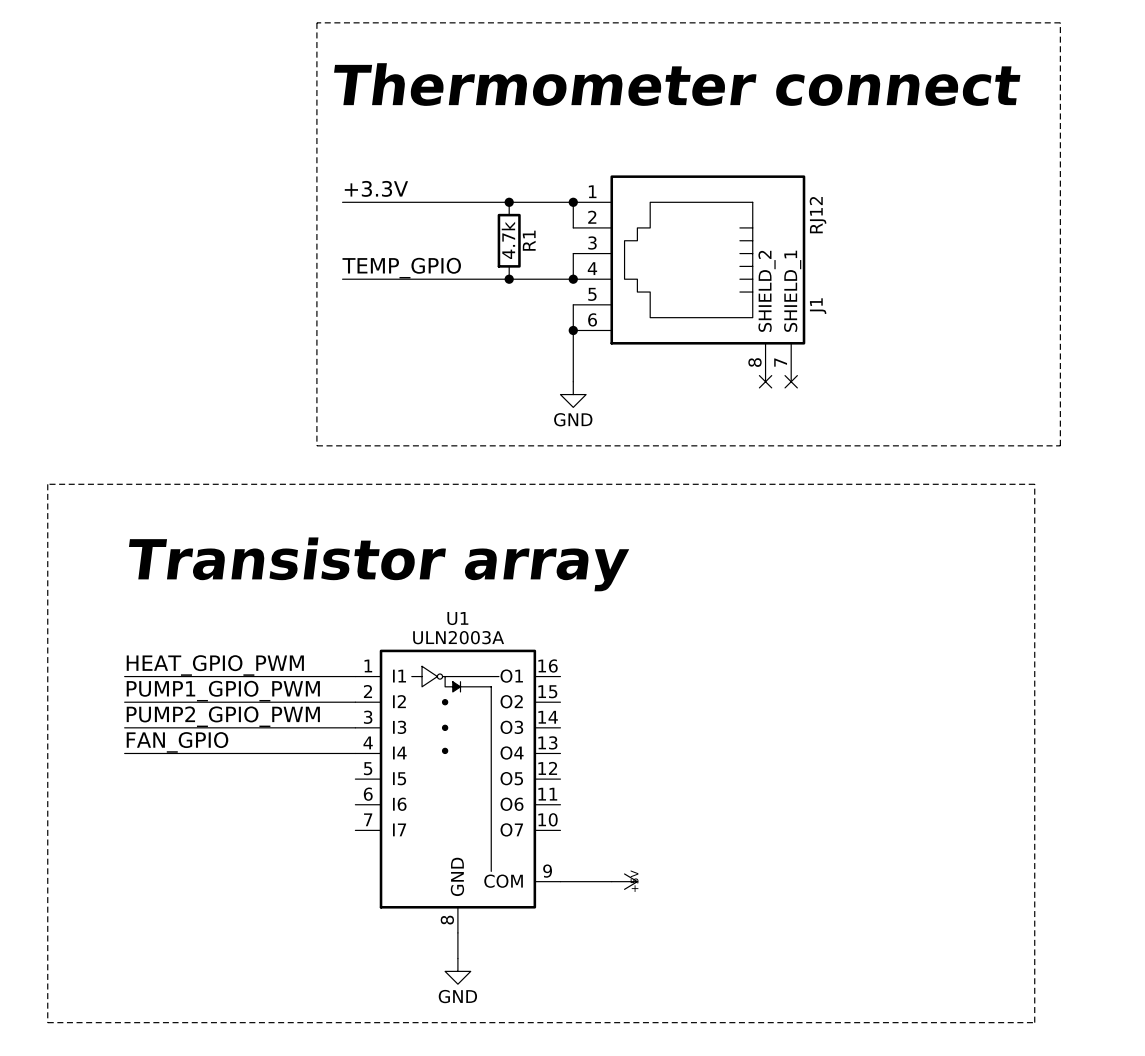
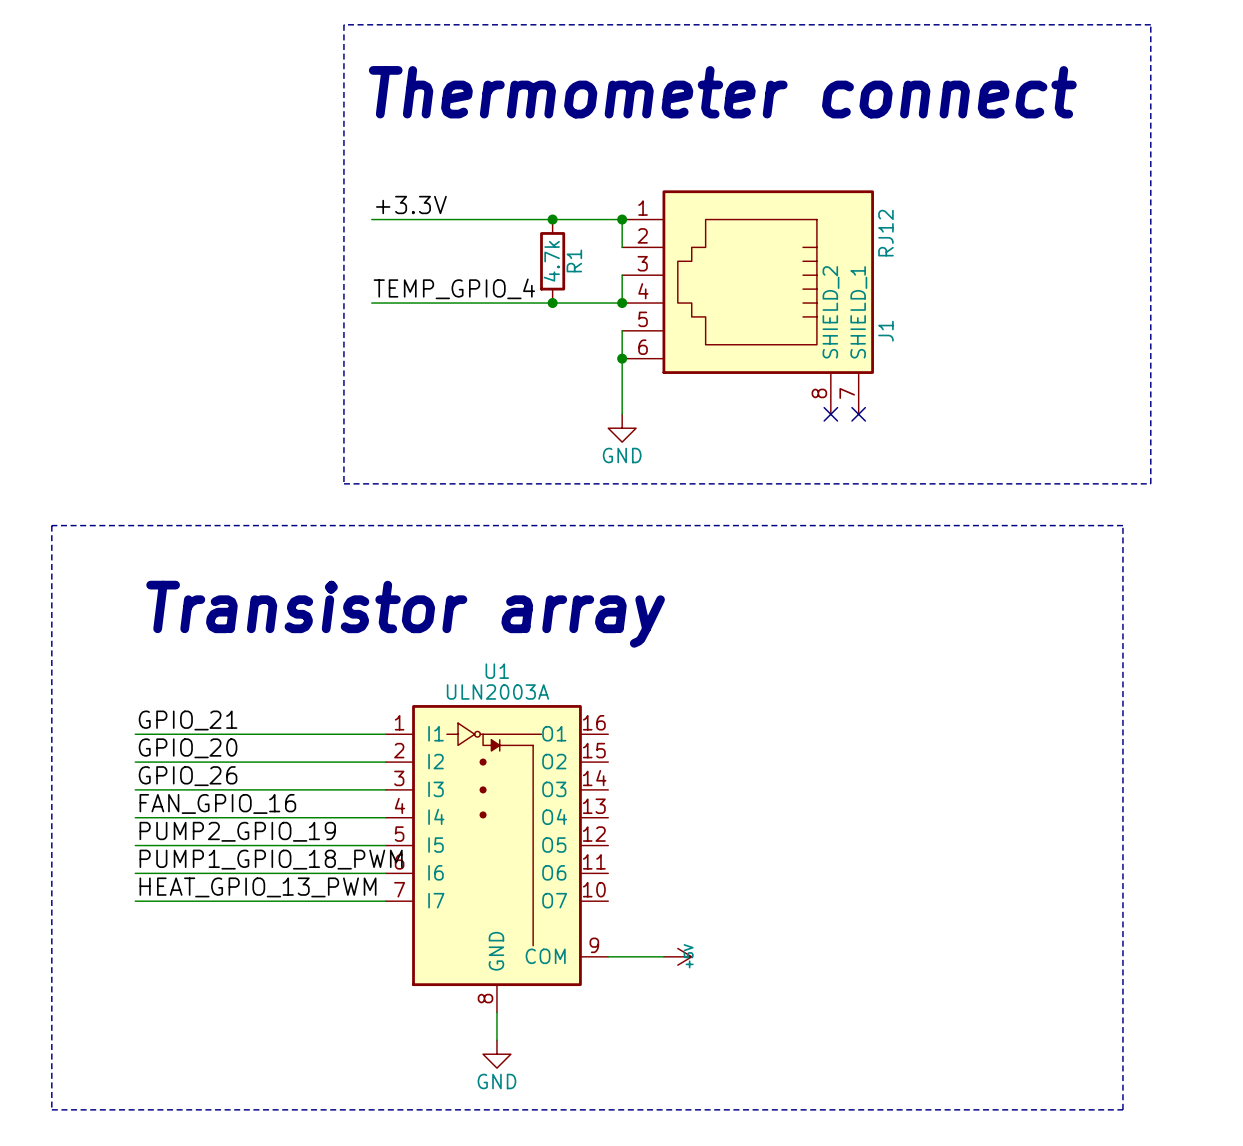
label: TEMP_GPIO (401, 268) -> TEMP_GPIO_4 (454, 288)
label: HEAT_GPIO_PWM (215, 665) -> GPIO_21 (188, 720)
label: PUMP1_GPIO_PWM (223, 691) -> GPIO_20 (188, 748)
label: PUMP2_GPIO_PWM (223, 716) -> GPIO_26 (188, 776)
label: FAN_GPIO (177, 742) -> FAN_GPIO_16 (217, 803)
label: none -> PUMP2_GPIO_19 (237, 831)
wire: none -> (135, 845) (385, 845)
label: none -> PUMP1_GPIO_18_PWM (271, 859)
wire: none -> (135, 873) (385, 873)
label: none -> HEAT_GPIO_13_PWM (258, 887)
wire: none -> (135, 901) (385, 901)

